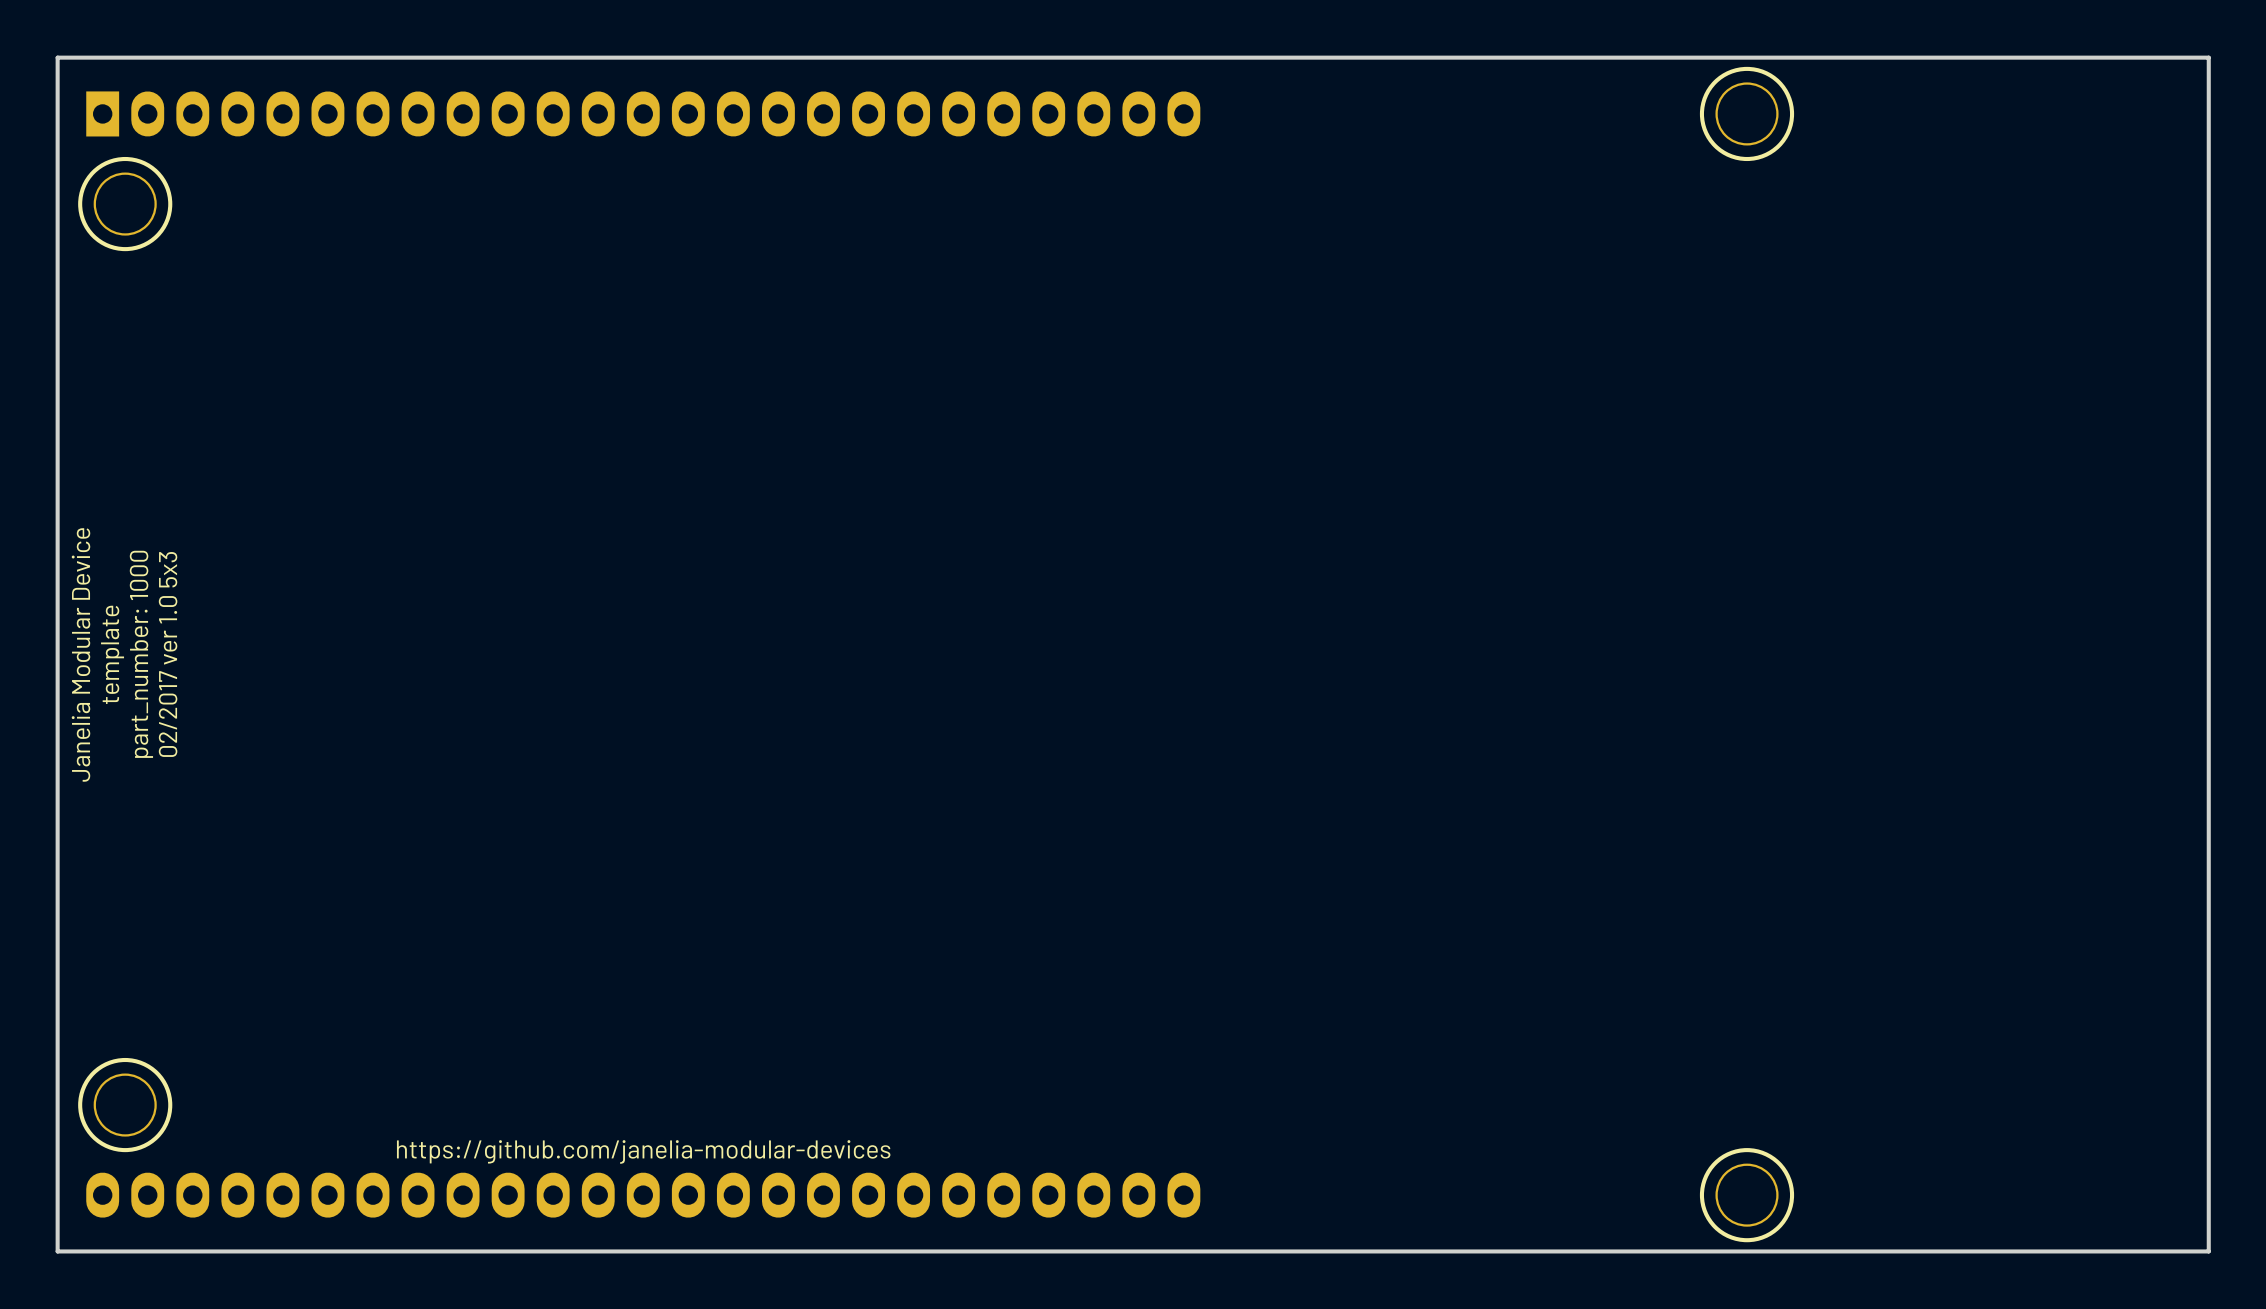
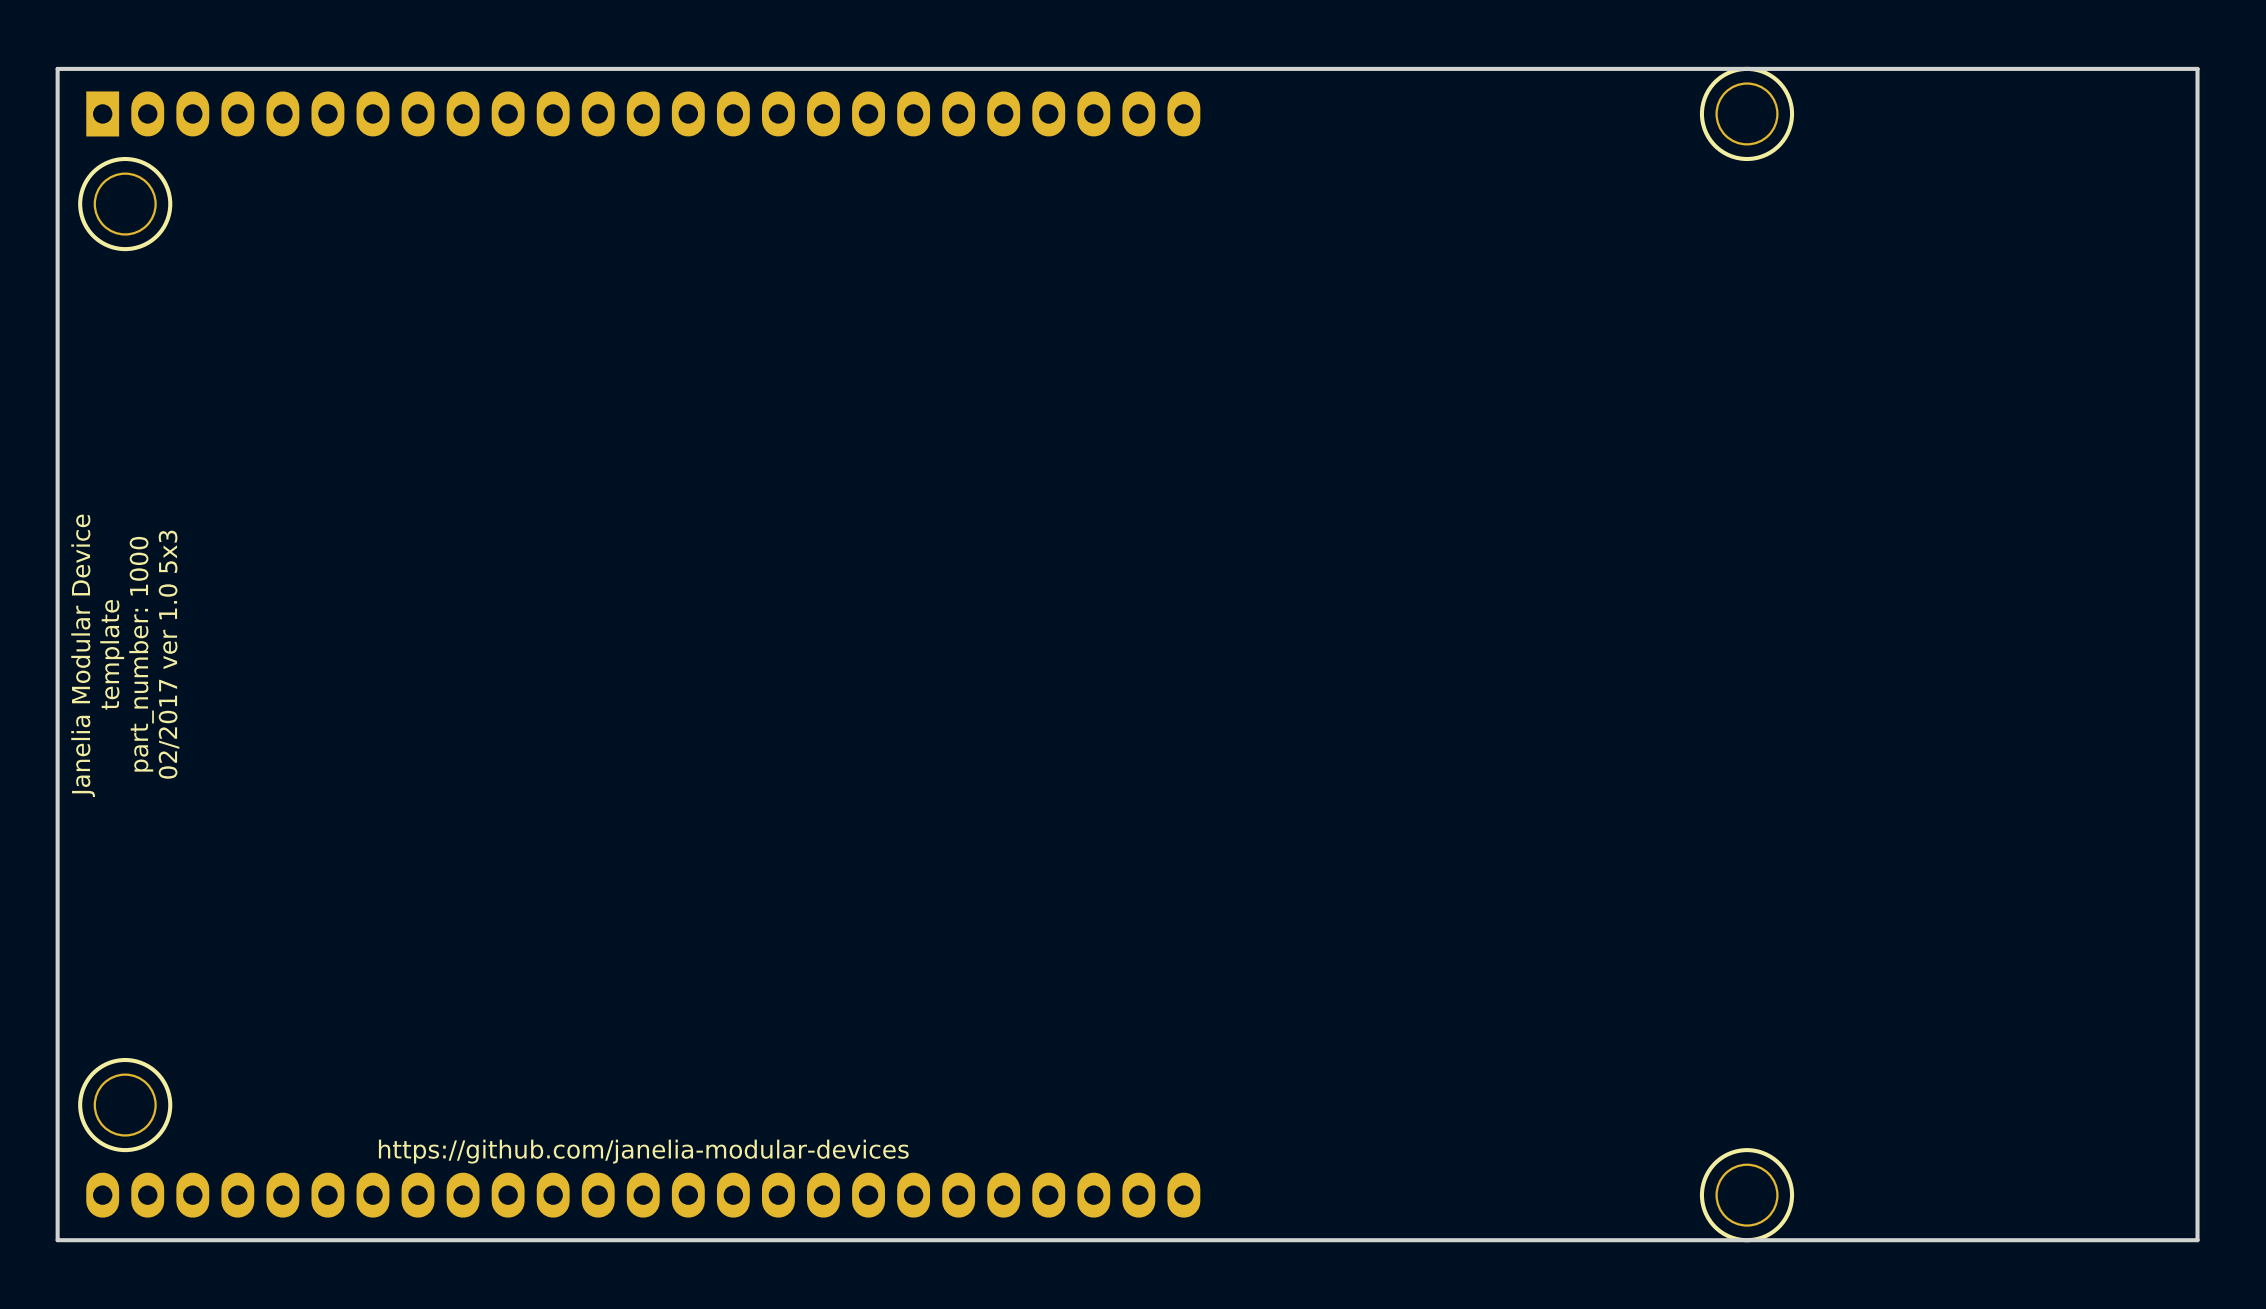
board edge: (57, 68) (57, 57) (2208, 57) (2208, 1251) (57, 1251) (57, 1240) -> (57, 68) (2197, 68) (2197, 1240) (57, 1240)

